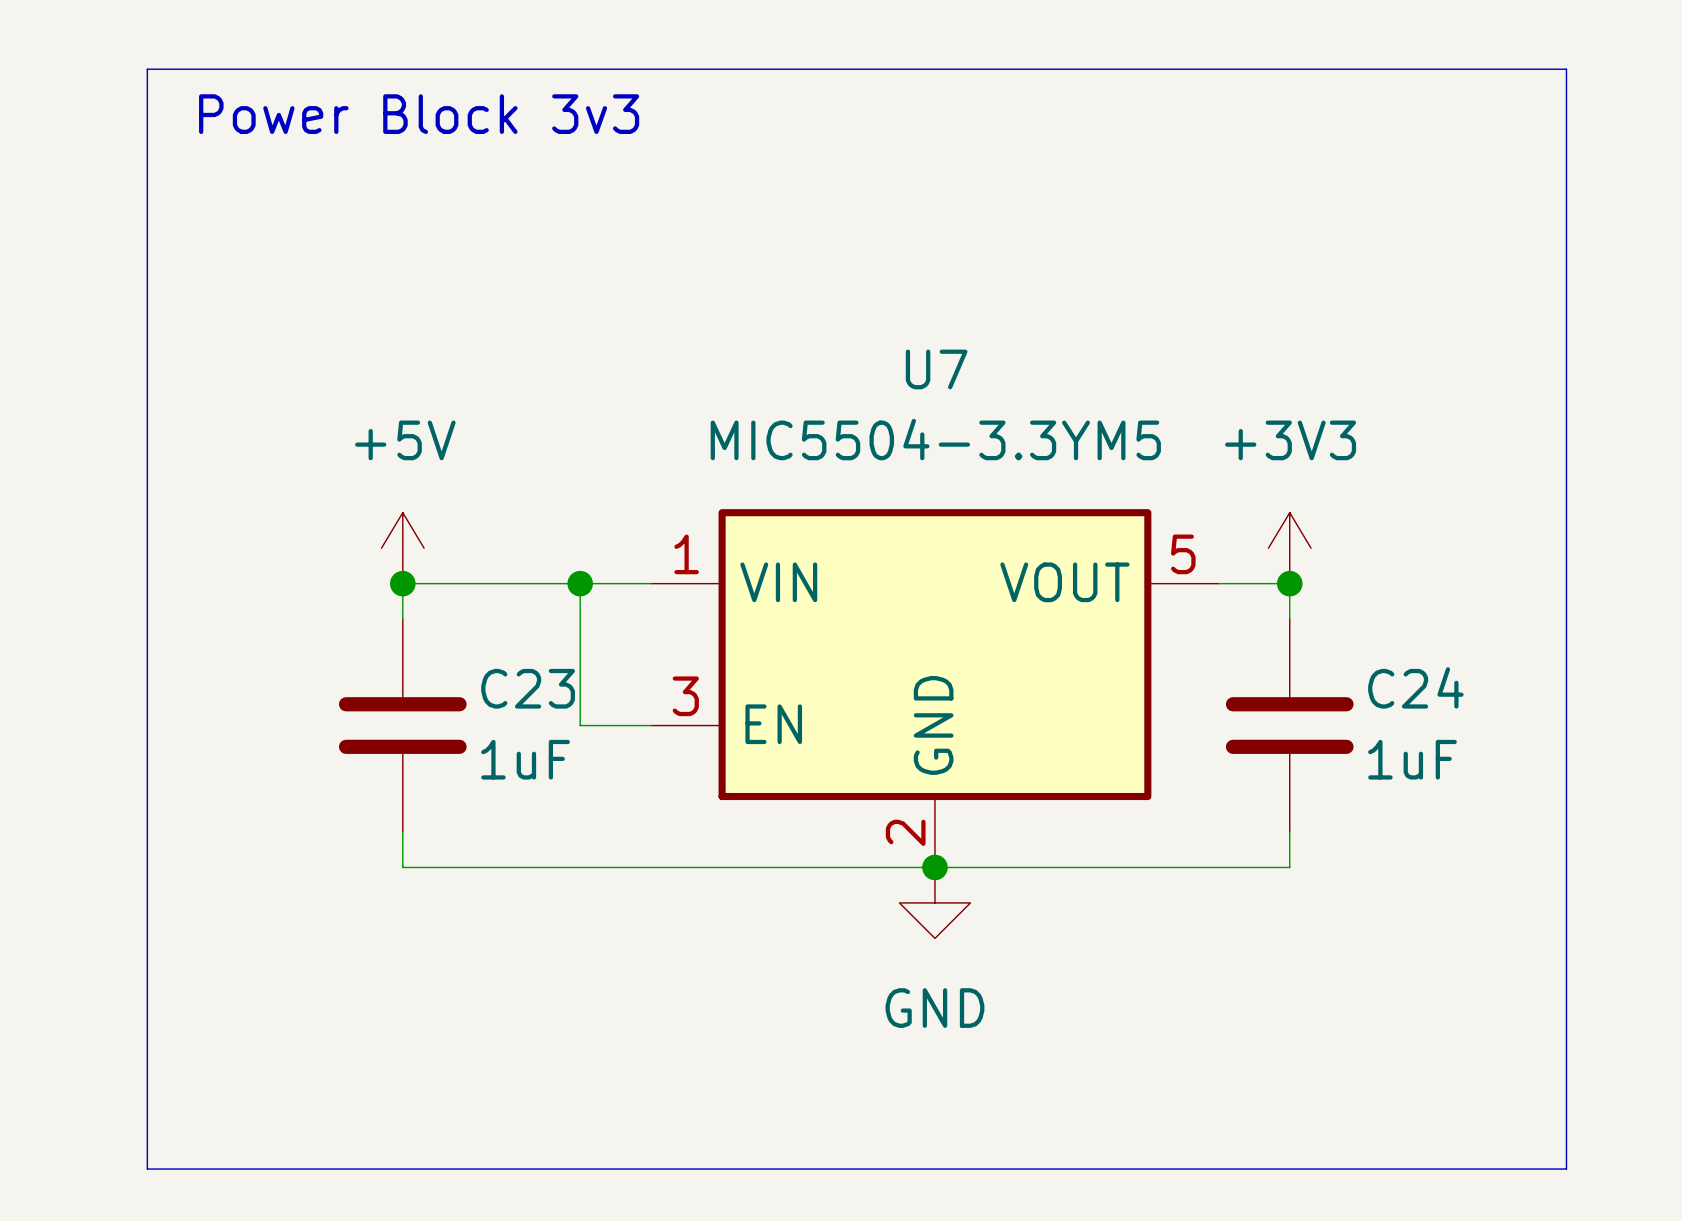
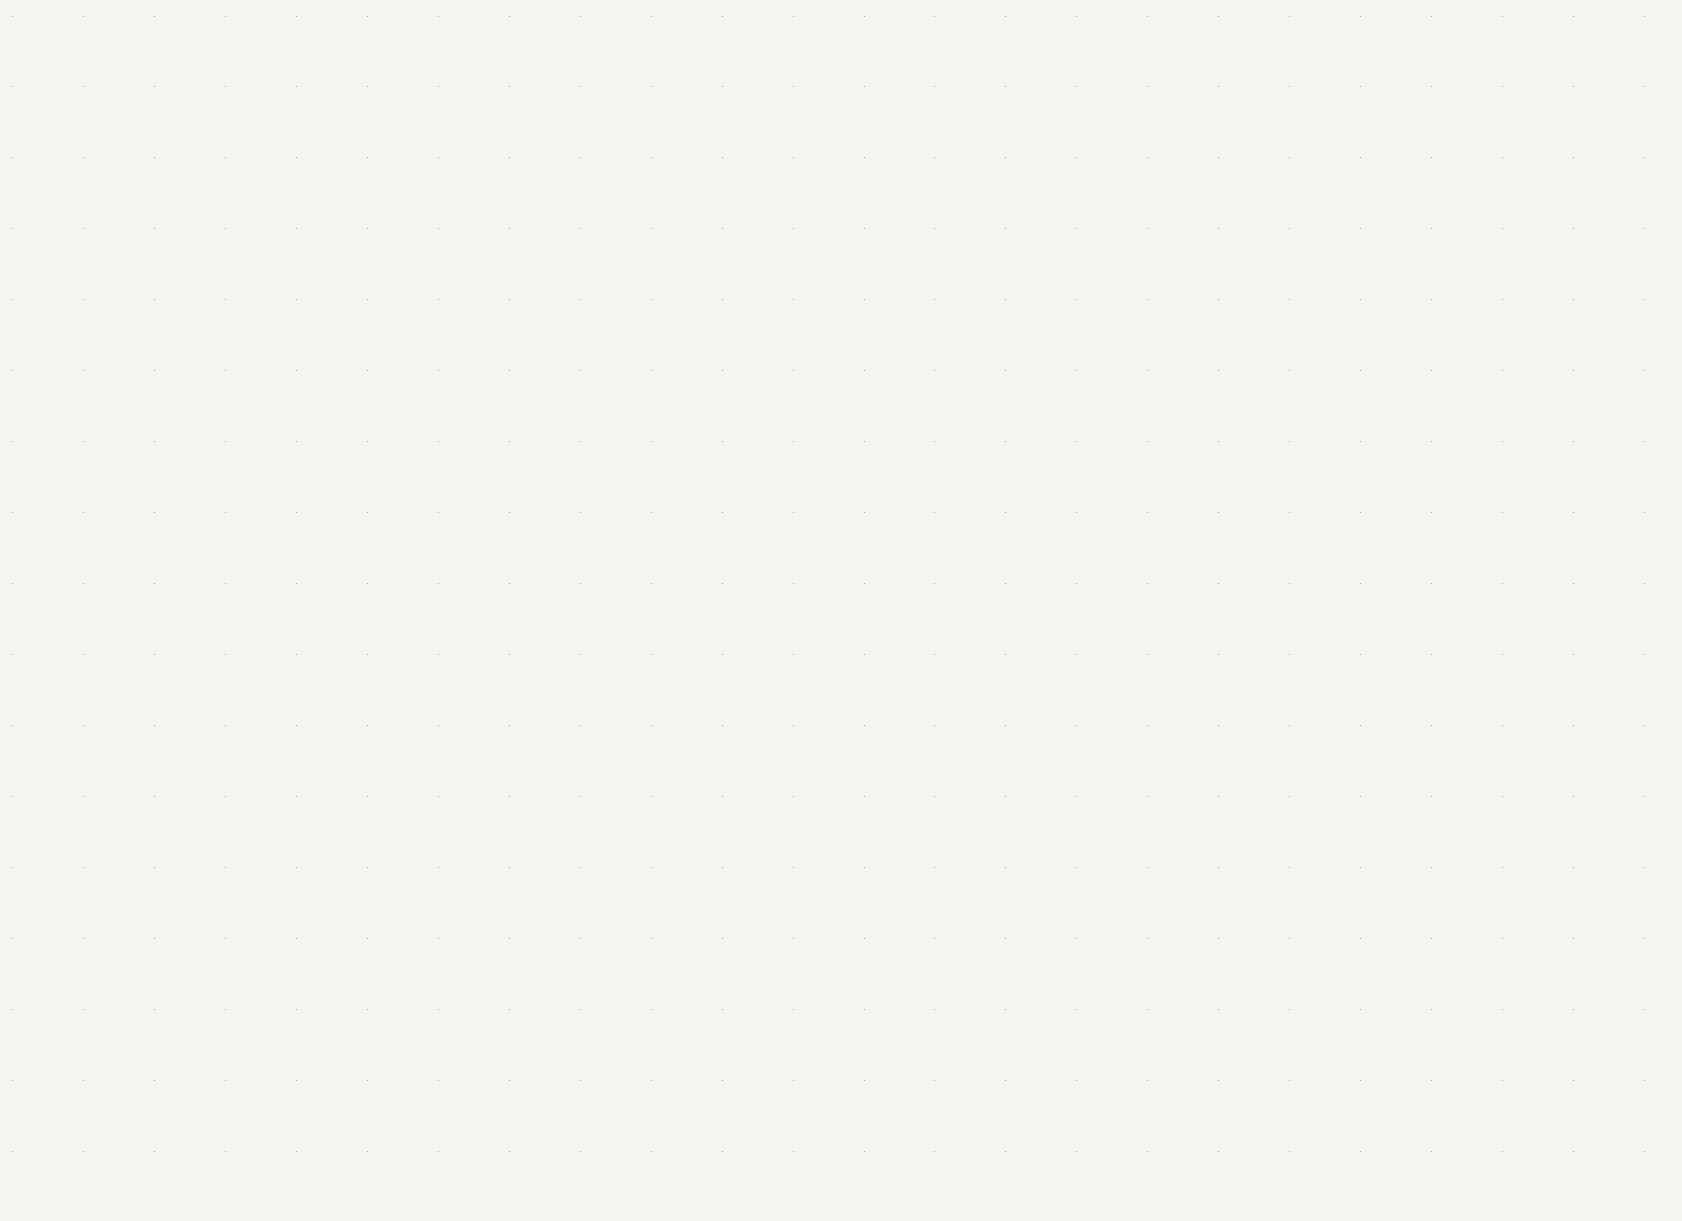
line: (147, 69) (1566, 69) (1566, 1169) (147, 1169) (147, 69) -> none
text: Power Block 3v3 (419, 114) -> none
power symbol: +5V (402, 548) -> none
power symbol: +3V3 (1289, 548) -> none
junction: (402, 583) -> none
wire: (580, 583) (580, 725) (651, 725) -> none
junction: (580, 583) -> none
wire: (651, 583) (402, 583) (402, 619) -> none
wire: (1218, 583) (1289, 583) (1289, 619) -> none
junction: (1289, 583) -> none
U7: MIC5504-3.3YM5 (934, 688) -> none
C23: 1uF (402, 725) -> none
C24: 1uF (1289, 725) -> none
wire: (402, 831) (402, 867) (1289, 867) (1289, 831) -> none
junction: (934, 867) -> none
power symbol: GND (934, 902) -> none

